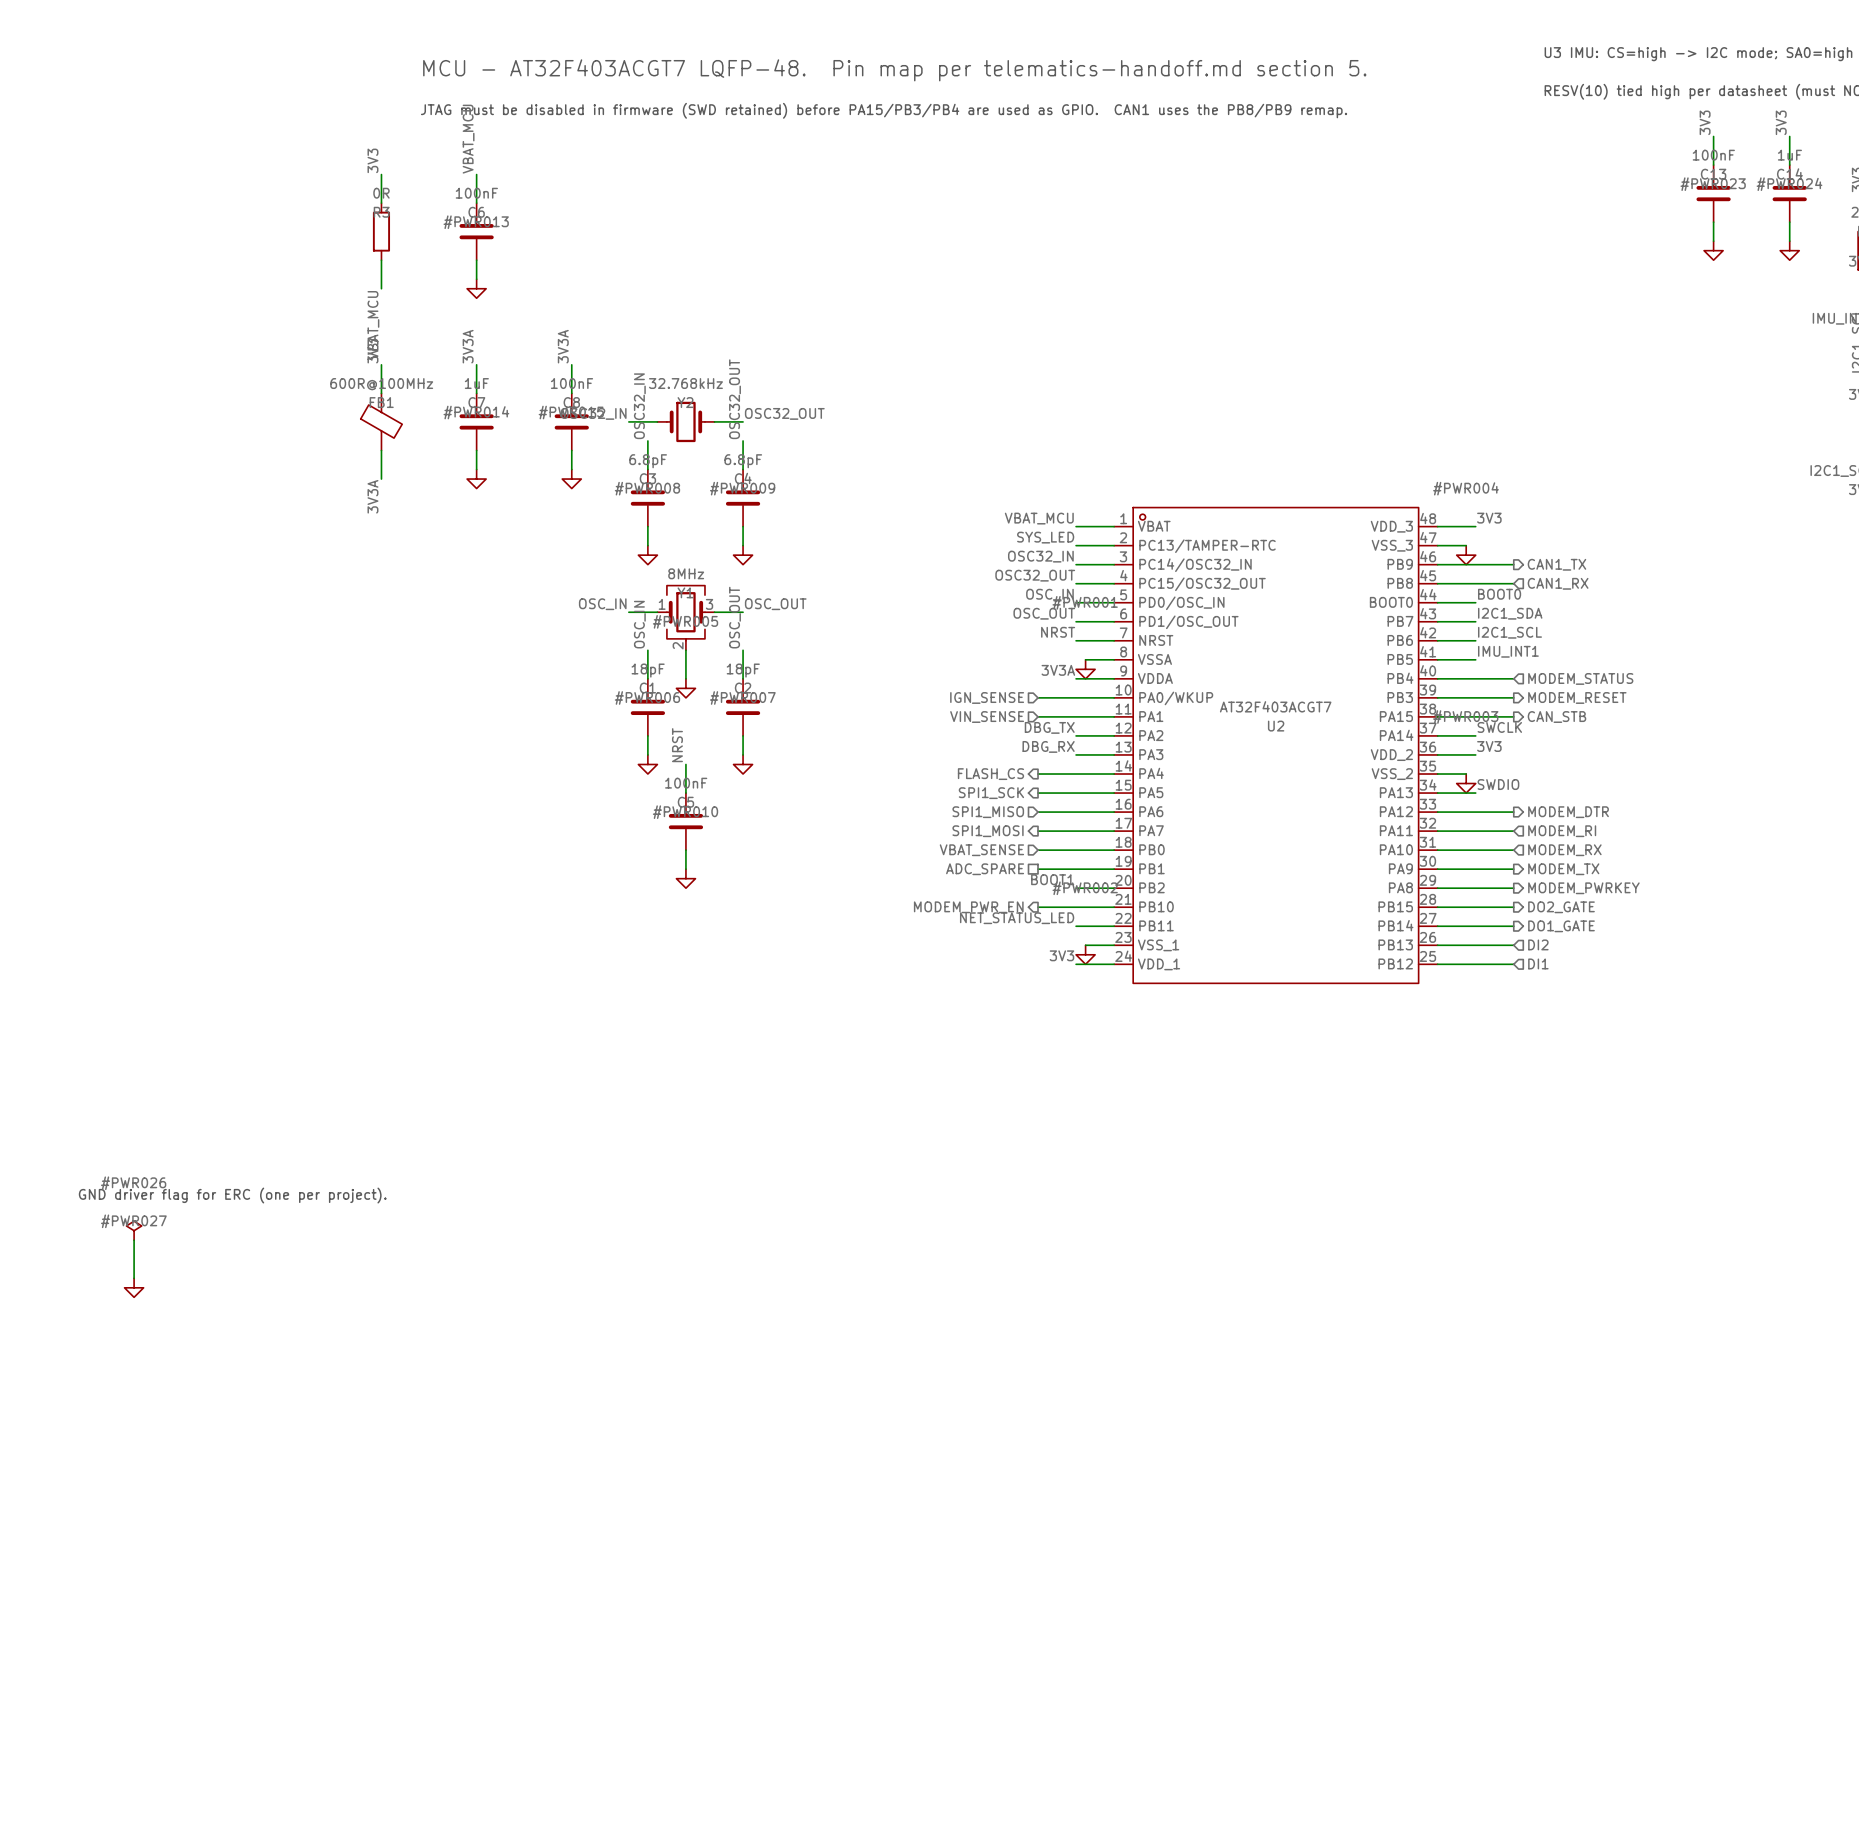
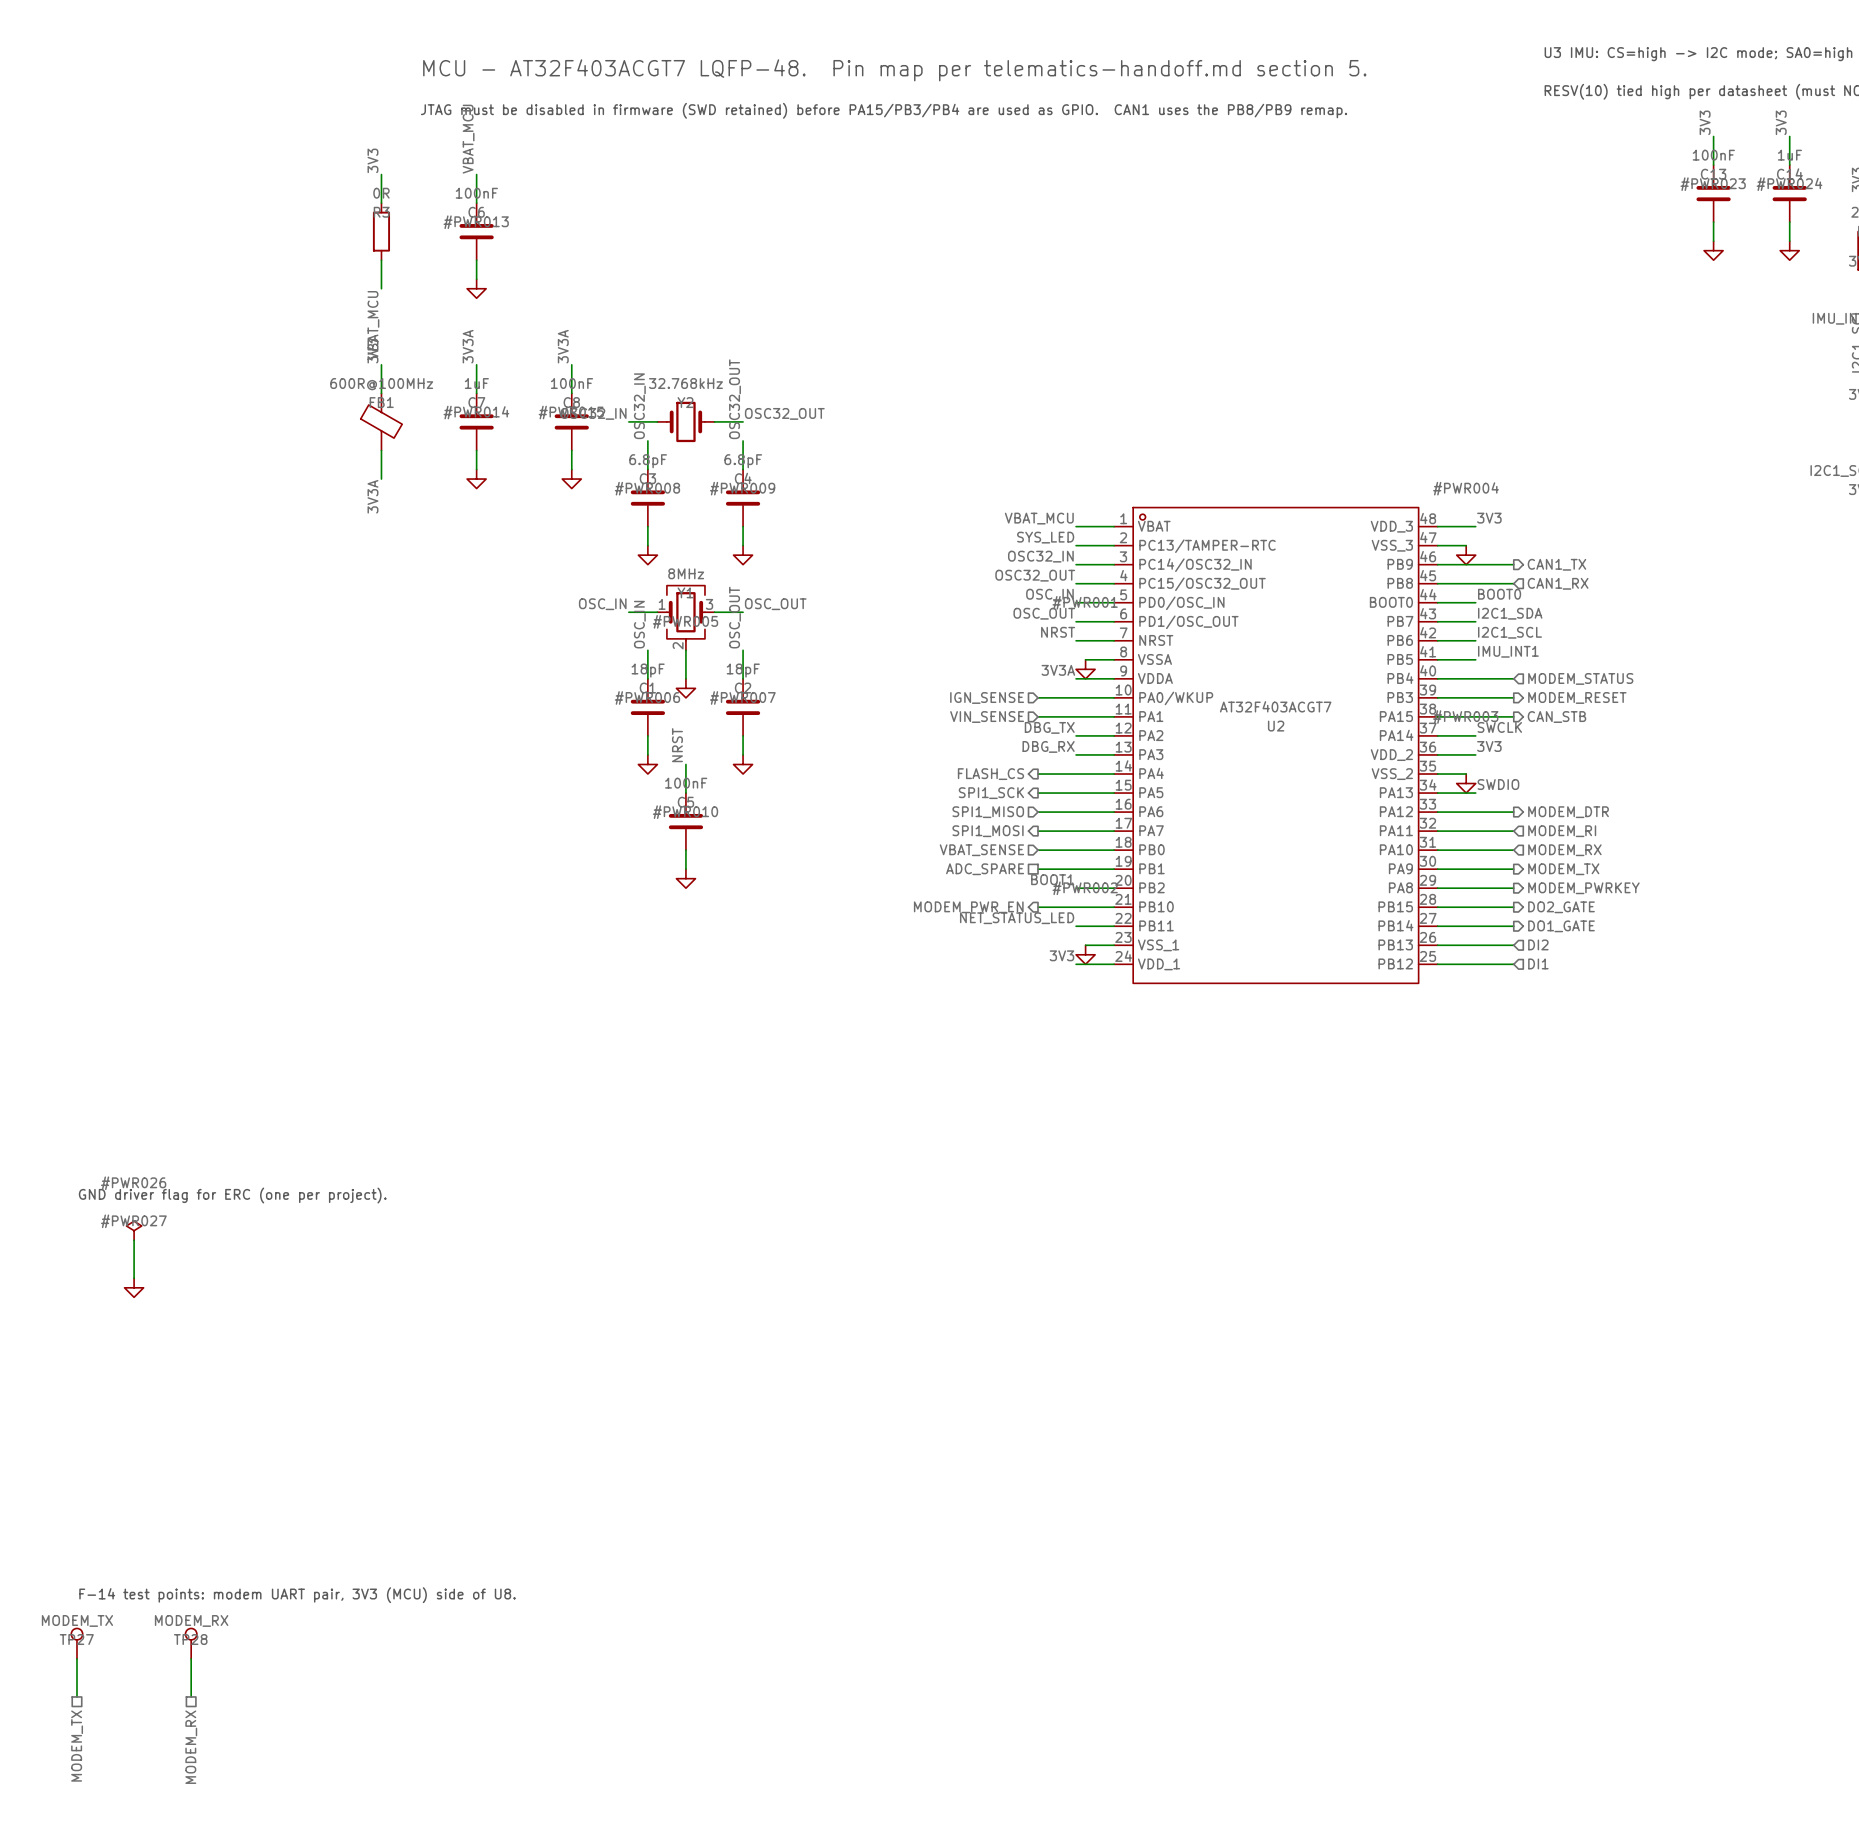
text: none -> F-14 test points: modem UART pair, 3V3 (MCU) side of U8. (297, 1595)
TP27: none -> MODEM_TX (76, 1643)
TP28: none -> MODEM_RX (191, 1643)
wire: none -> (76, 1658) (76, 1696)
wire: none -> (191, 1658) (191, 1696)
hierarchical label: none -> MODEM_TX (77, 1746)
hierarchical label: none -> MODEM_RX (191, 1747)

